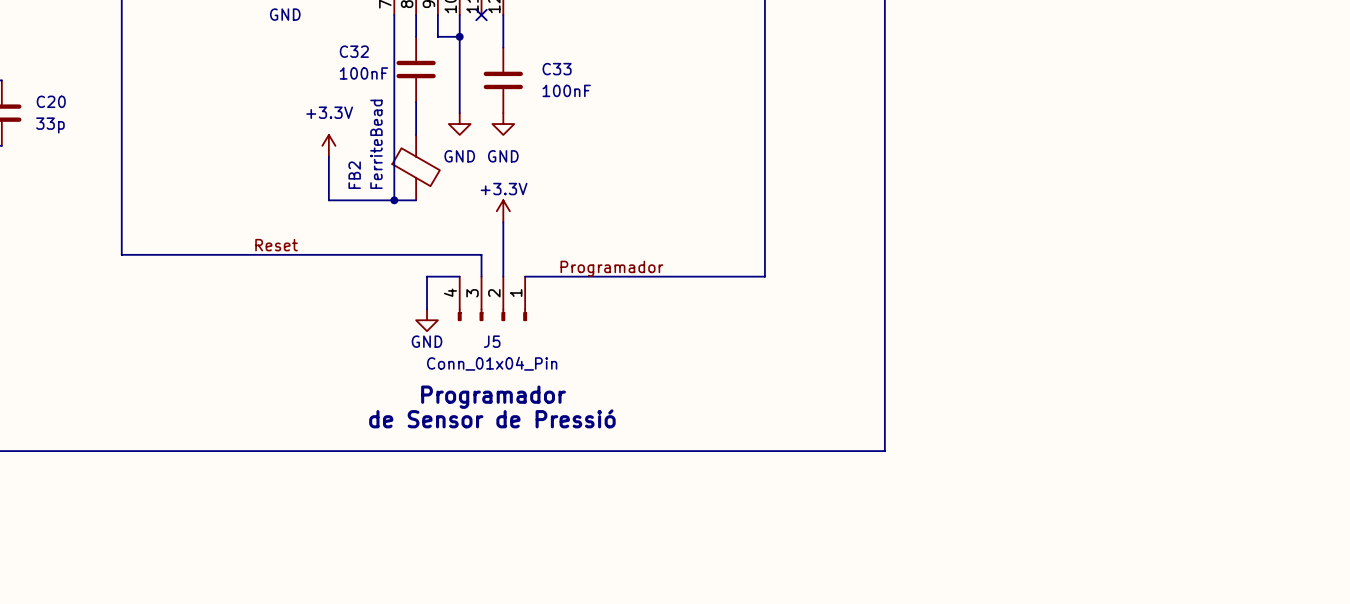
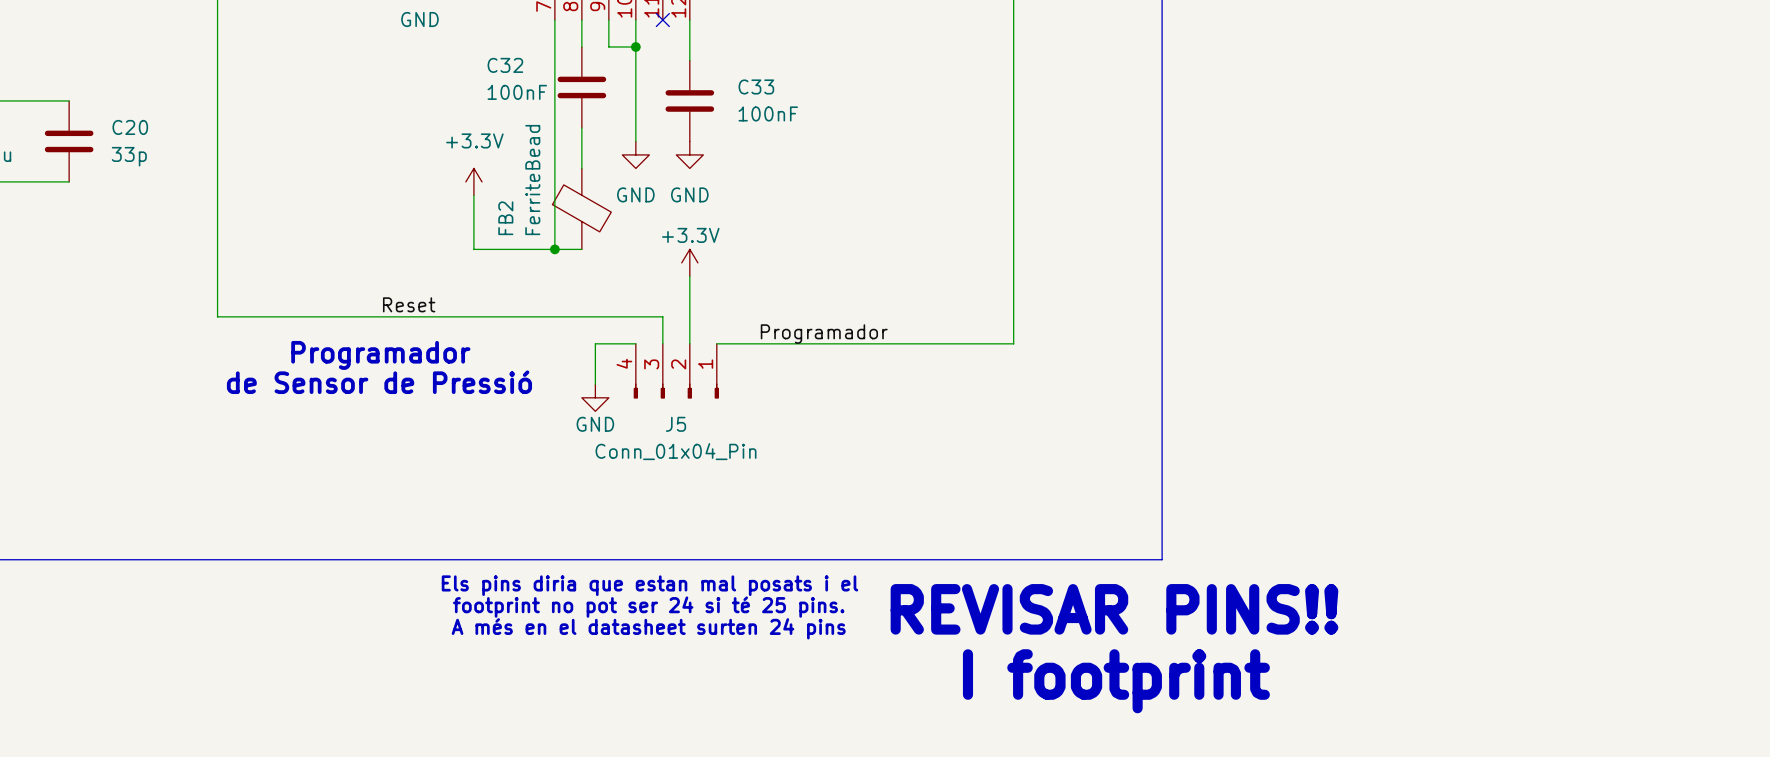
text: none -> Programador (380, 355)
text: none -> de Sensor de Pressió (379, 382)
text: Programador (493, 397) -> none
text: de Sensor de Pressió (492, 418) -> none
text: none -> Els pins diria que estan mal posats i el (649, 585)
text: none -> footprint no pot ser 24 si té 25 pins. (648, 607)
text: none -> REVISAR PINS!! (1114, 609)
text: none -> A més en el datasheet surten 24 pins (648, 628)
text: none -> I footprint (1116, 681)

